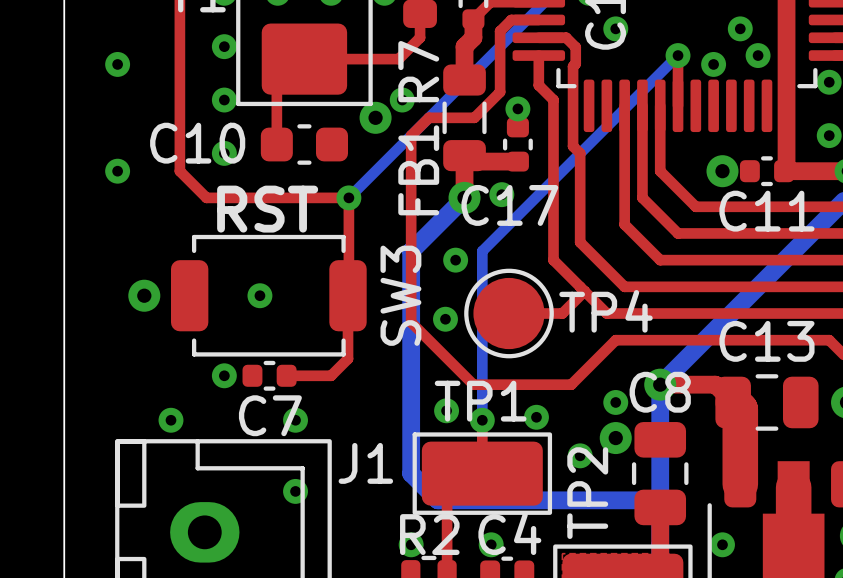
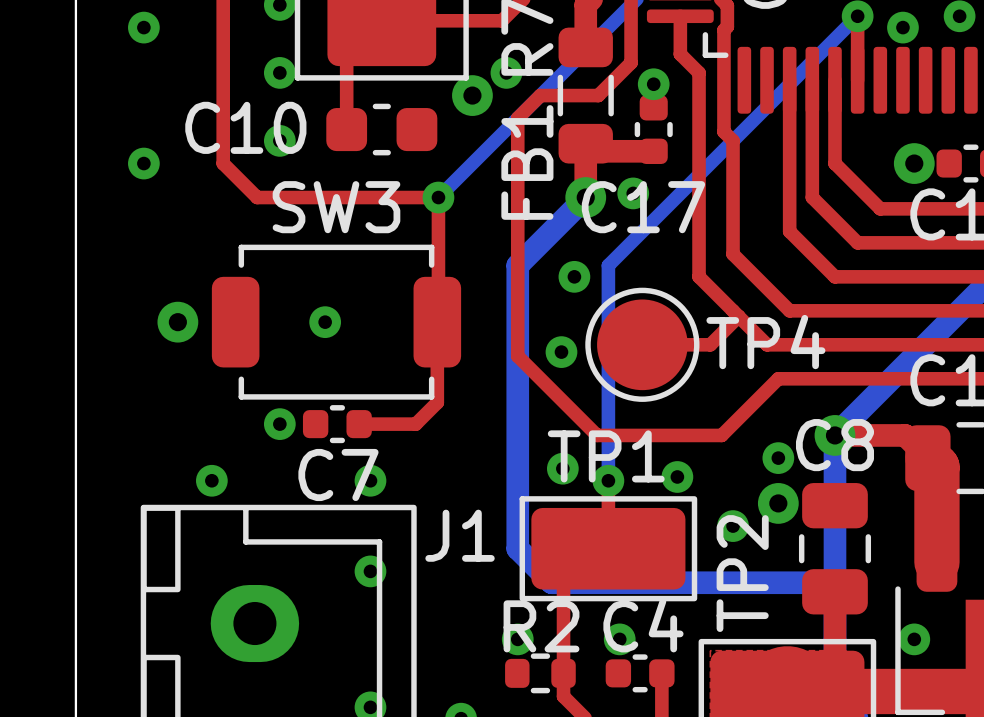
text: RST (267, 209) -> none
SW3 name rotation: 0° (400, 295) -> 90° clockwise (336, 207)
SW3 name position: SW3 (400, 295) -> SW3 (336, 207)

